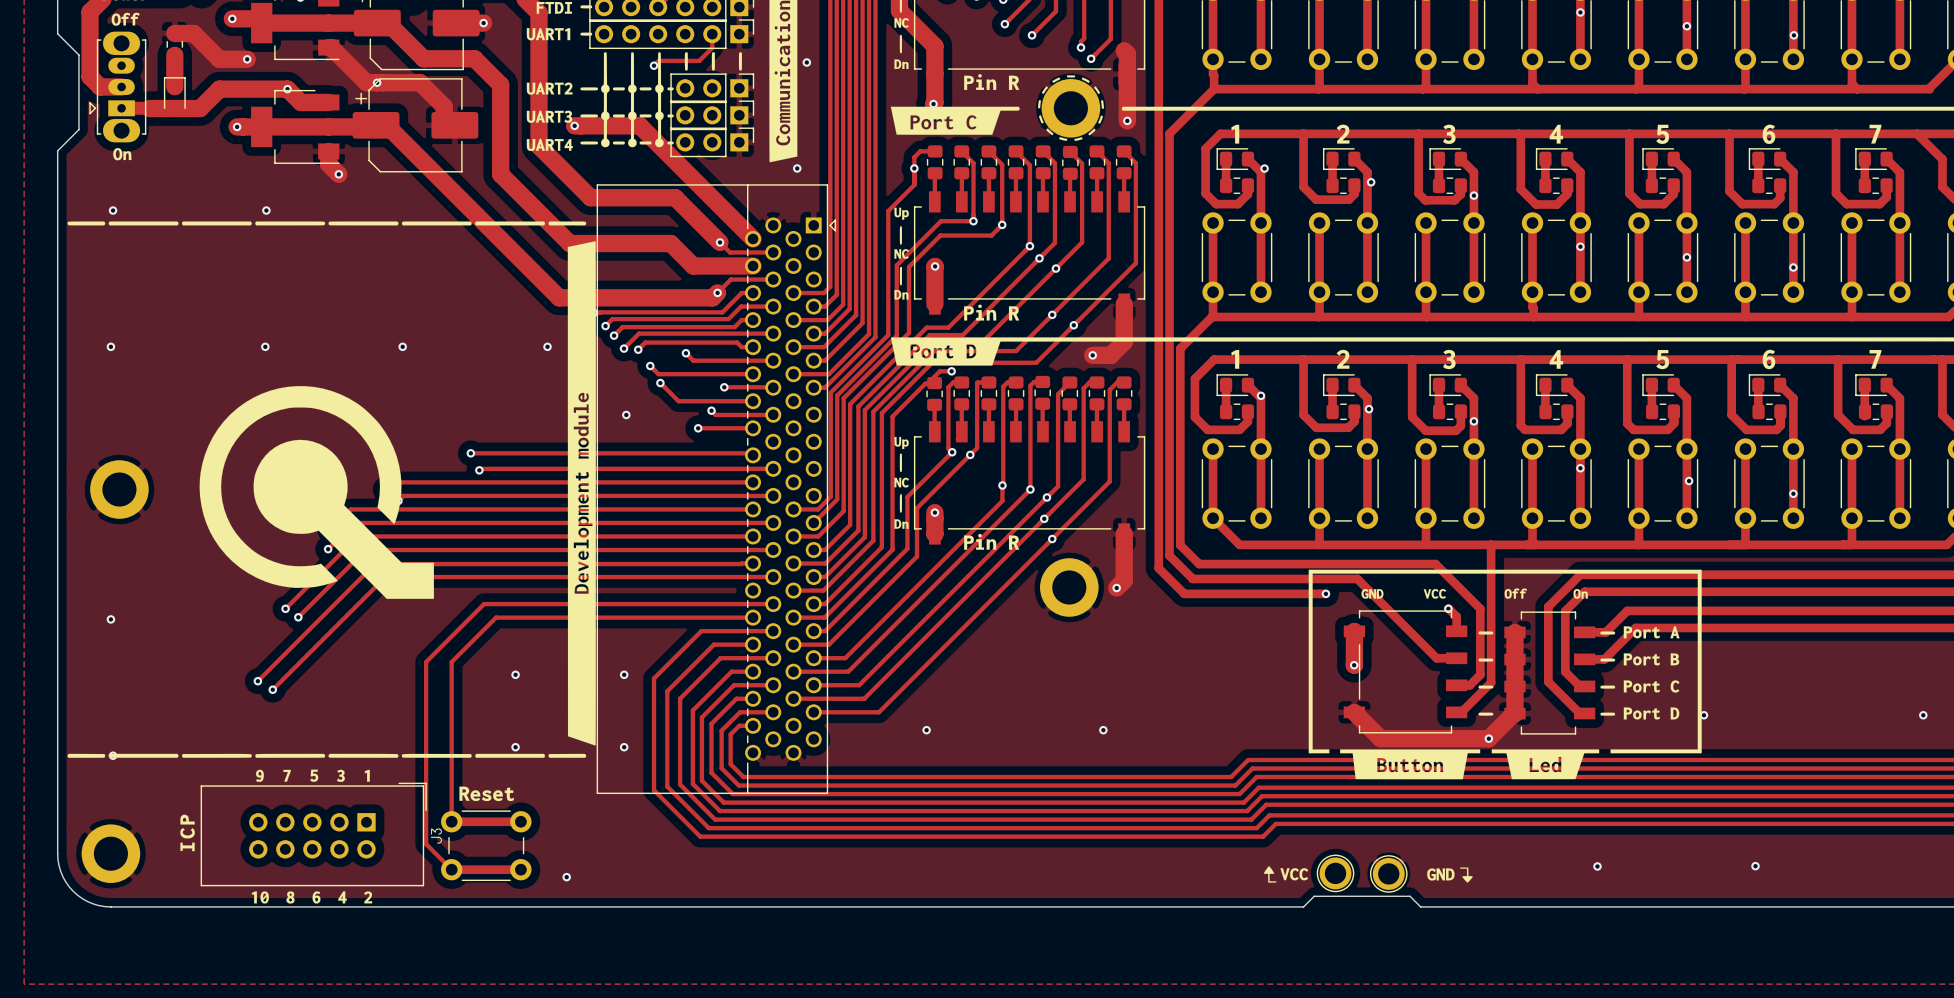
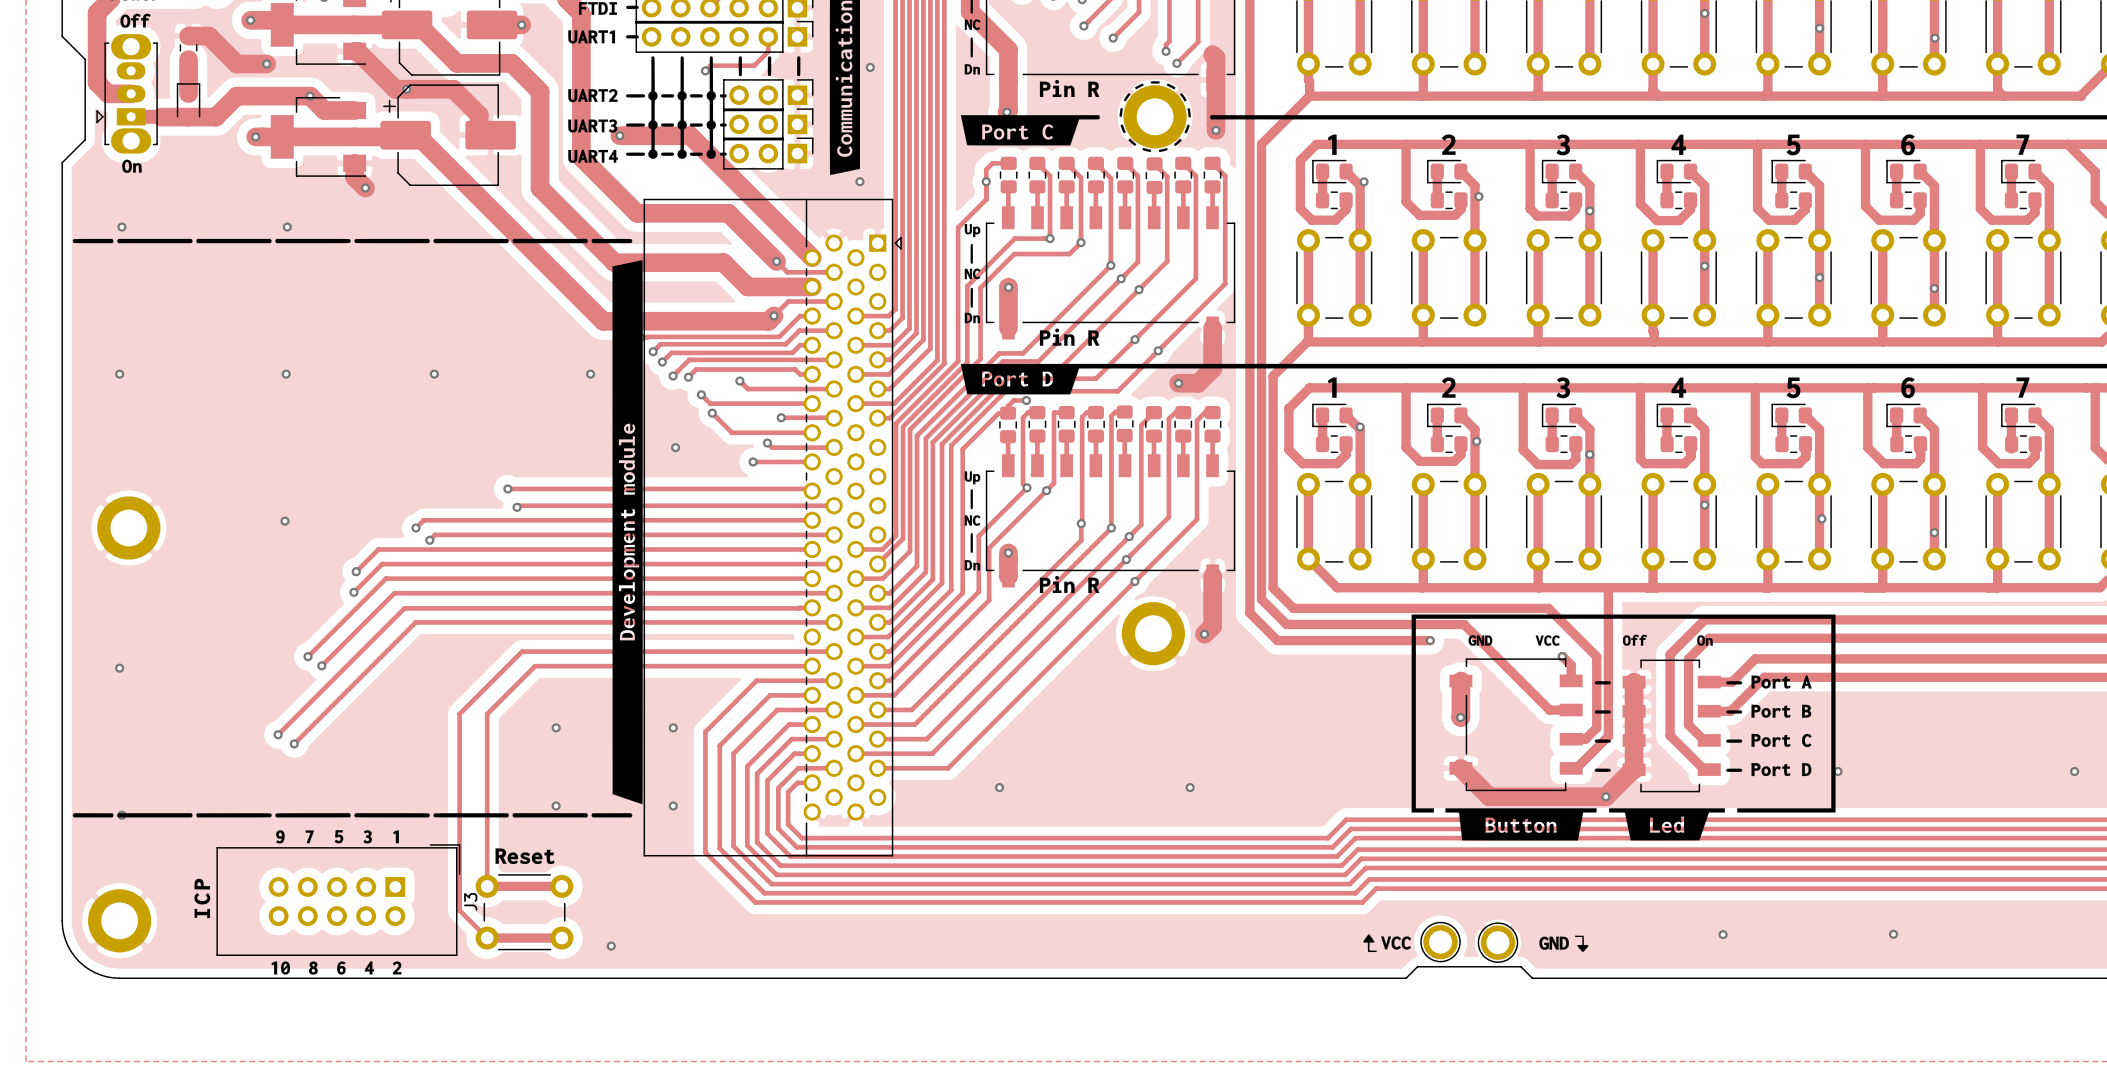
drawing: [199, 386, 434, 599] -> none

